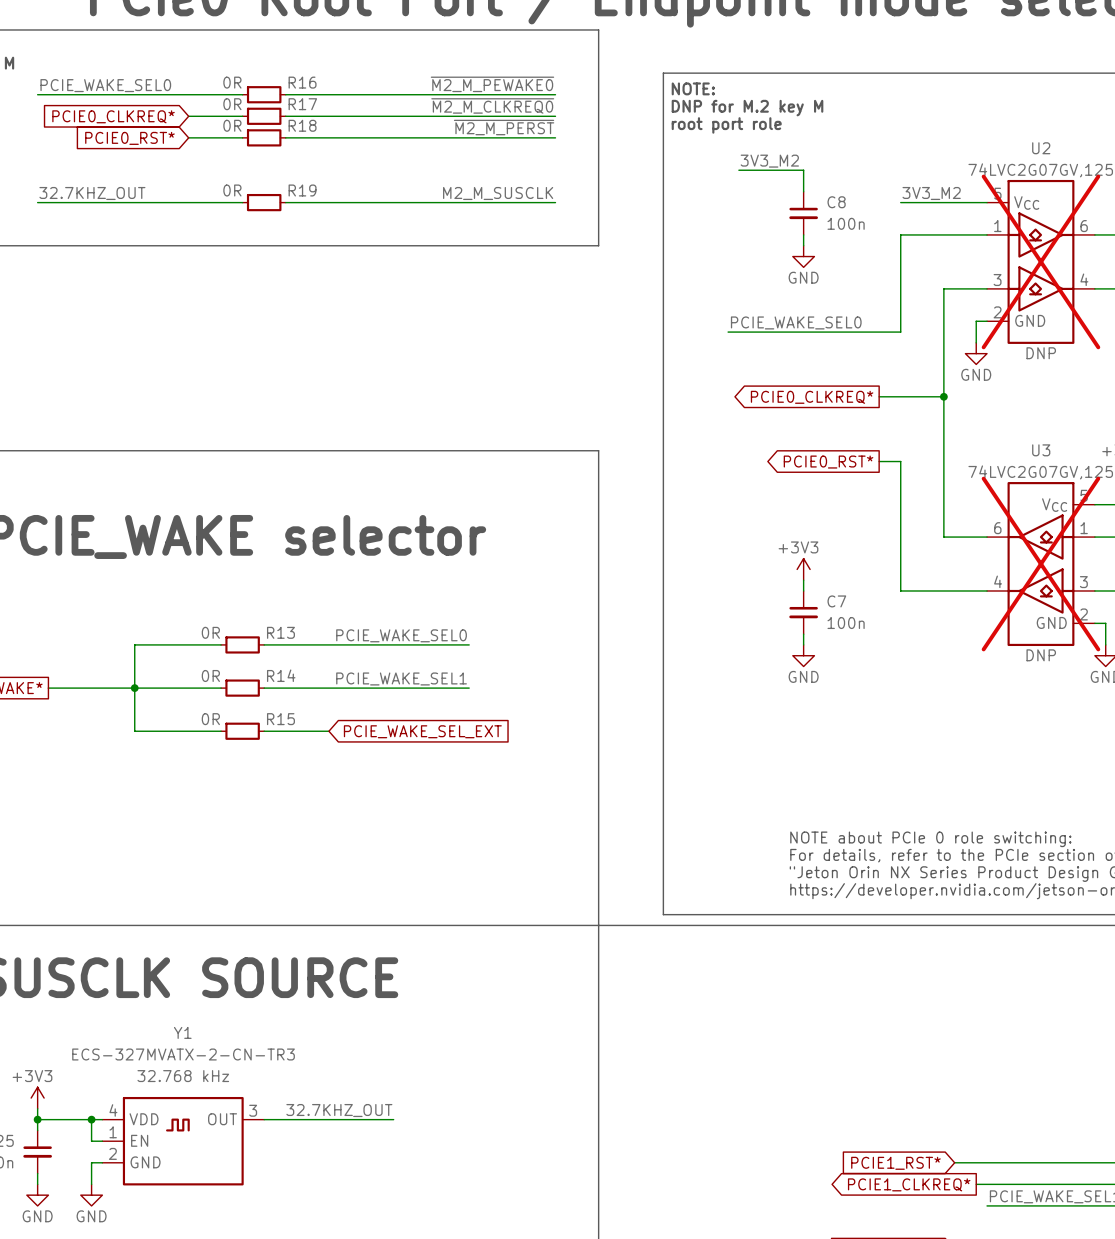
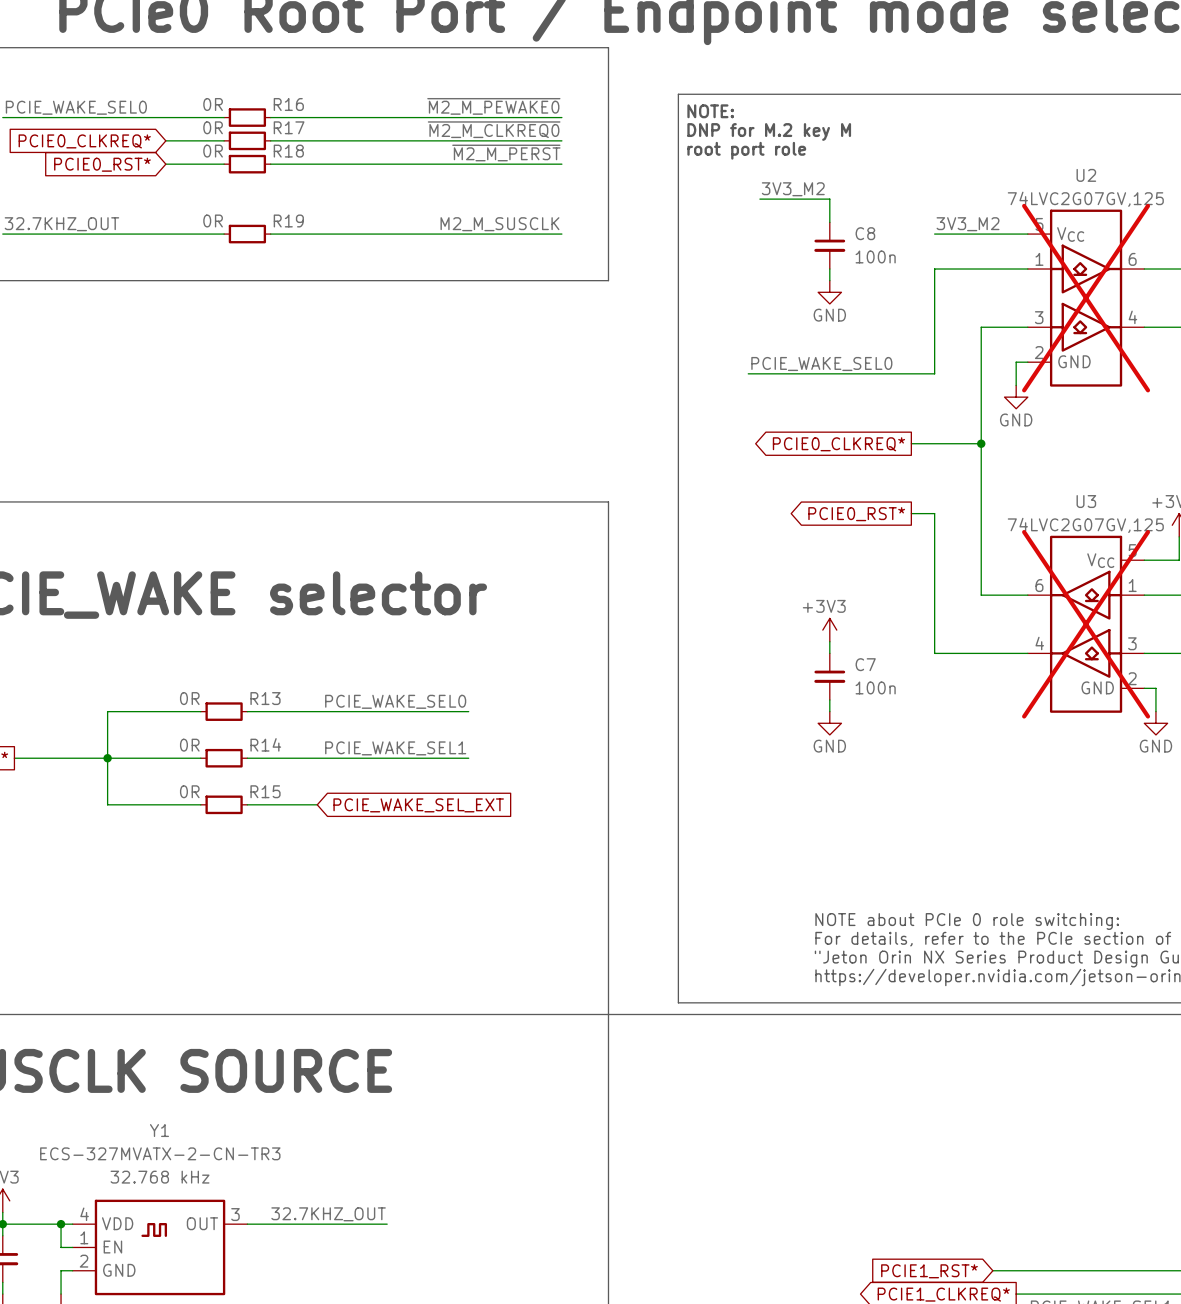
U2 text: DNP (1041, 353) -> none
U3 text: DNP (1041, 655) -> none

